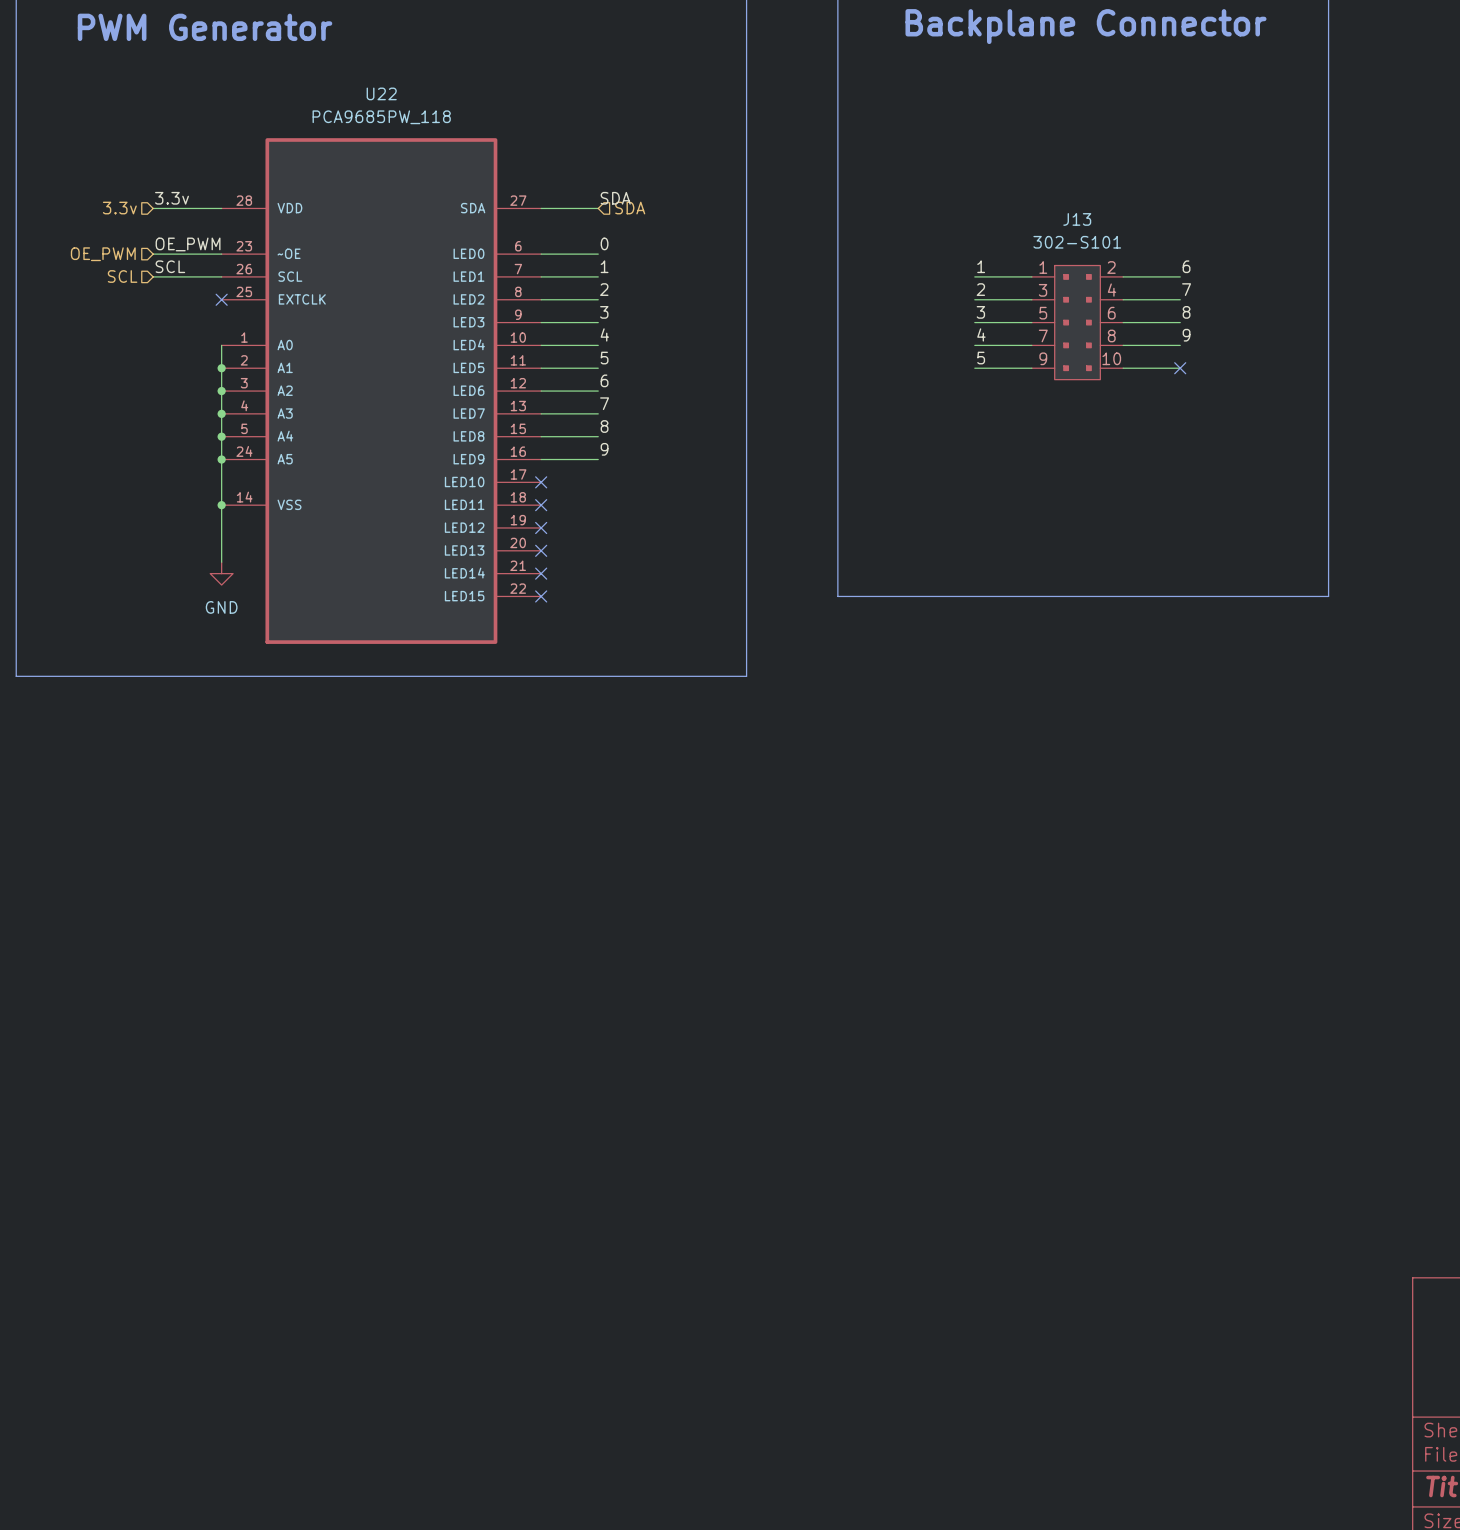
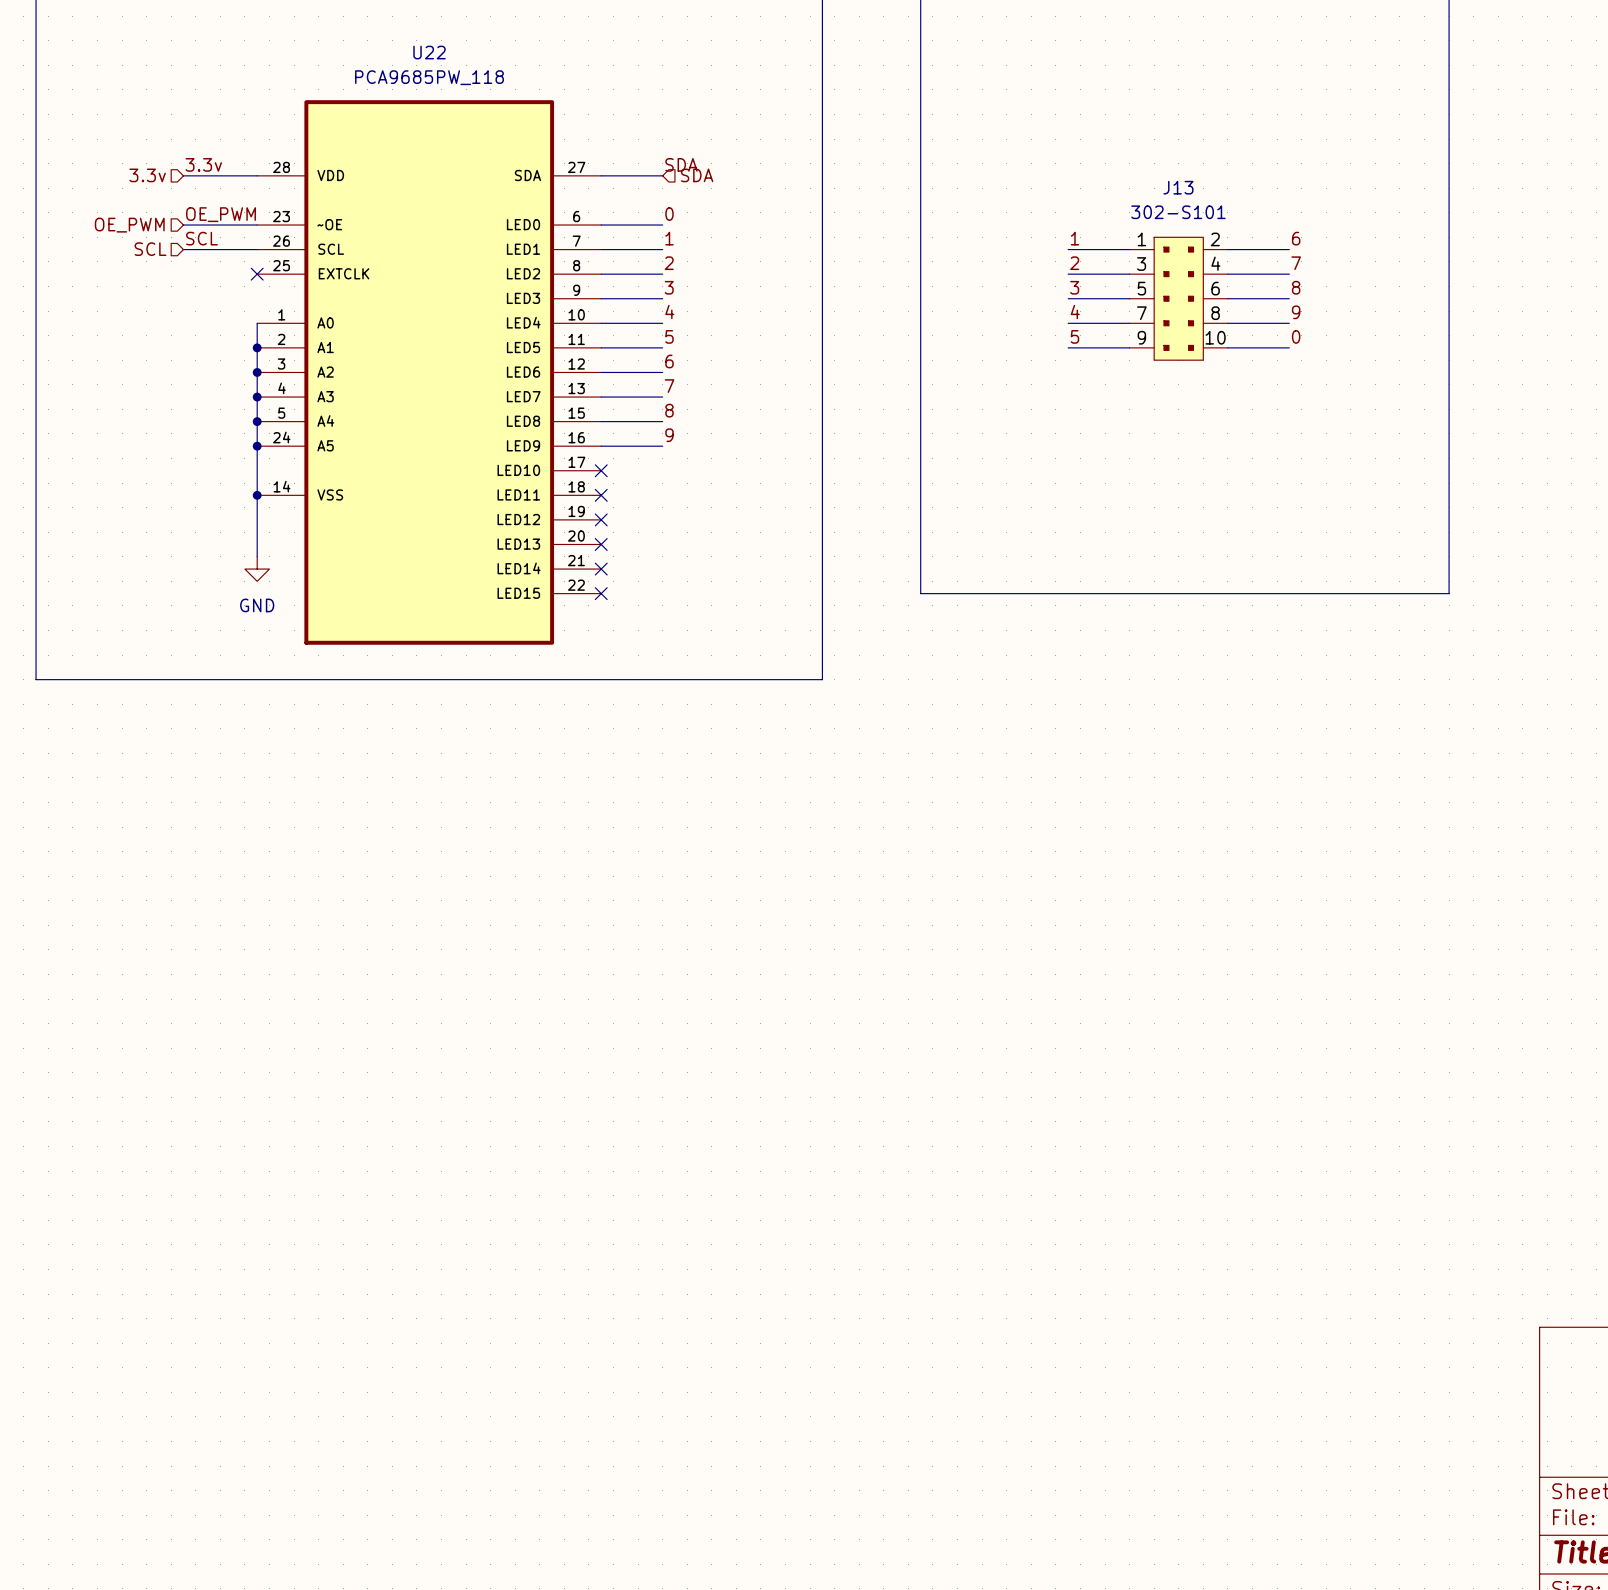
label: none -> 0 (1296, 336)
no-connect mark: (1180, 368) -> none

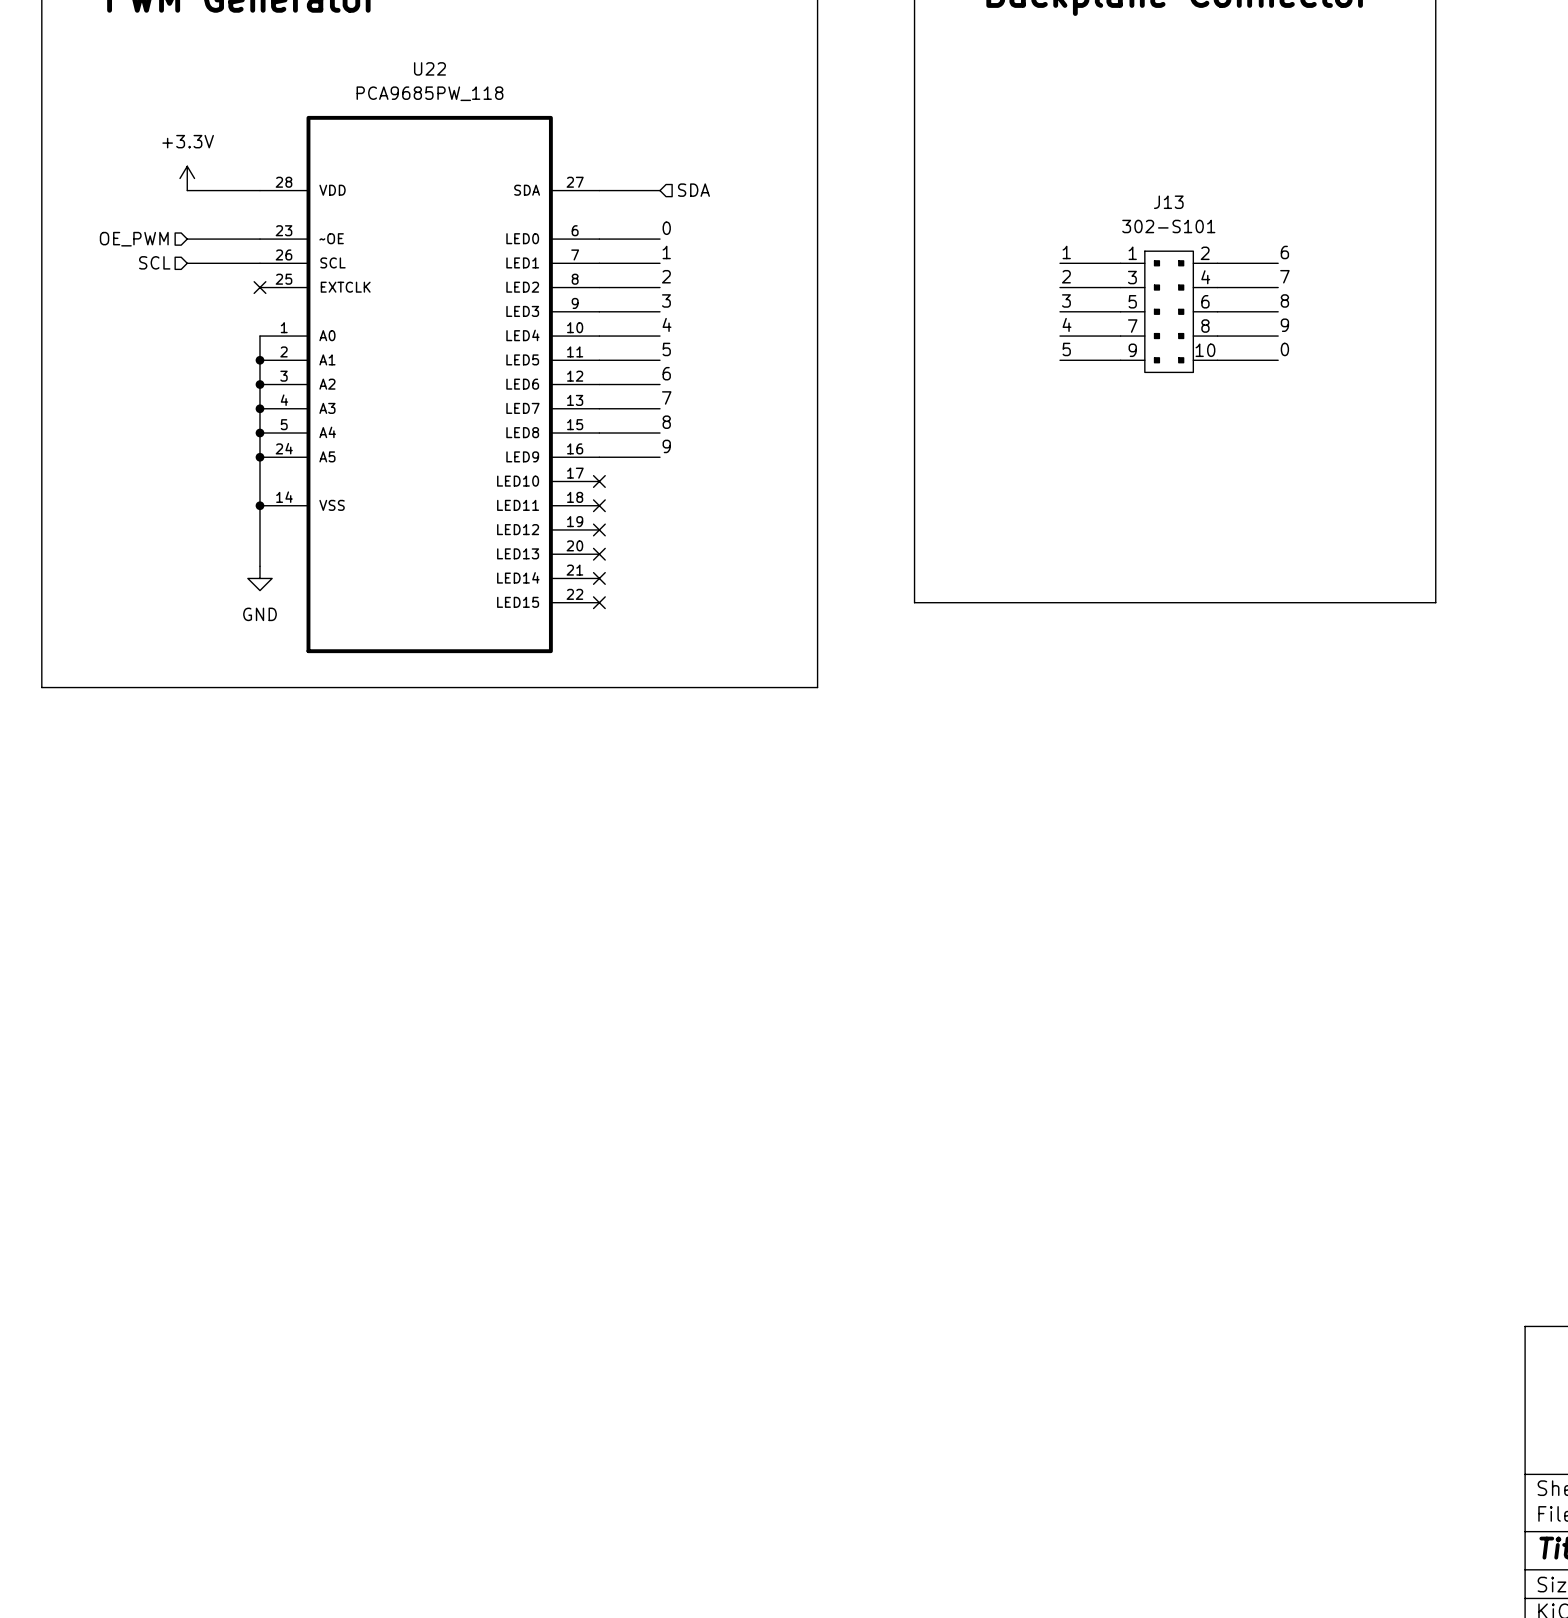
power symbol: none -> +3.3V (187, 178)
label: 3.3v (203, 164) -> none
label: SDA (681, 164) -> none
hierarchical label: 3.3v (147, 175) -> none
label: OE_PWM (221, 214) -> none
label: SCL (202, 238) -> none

